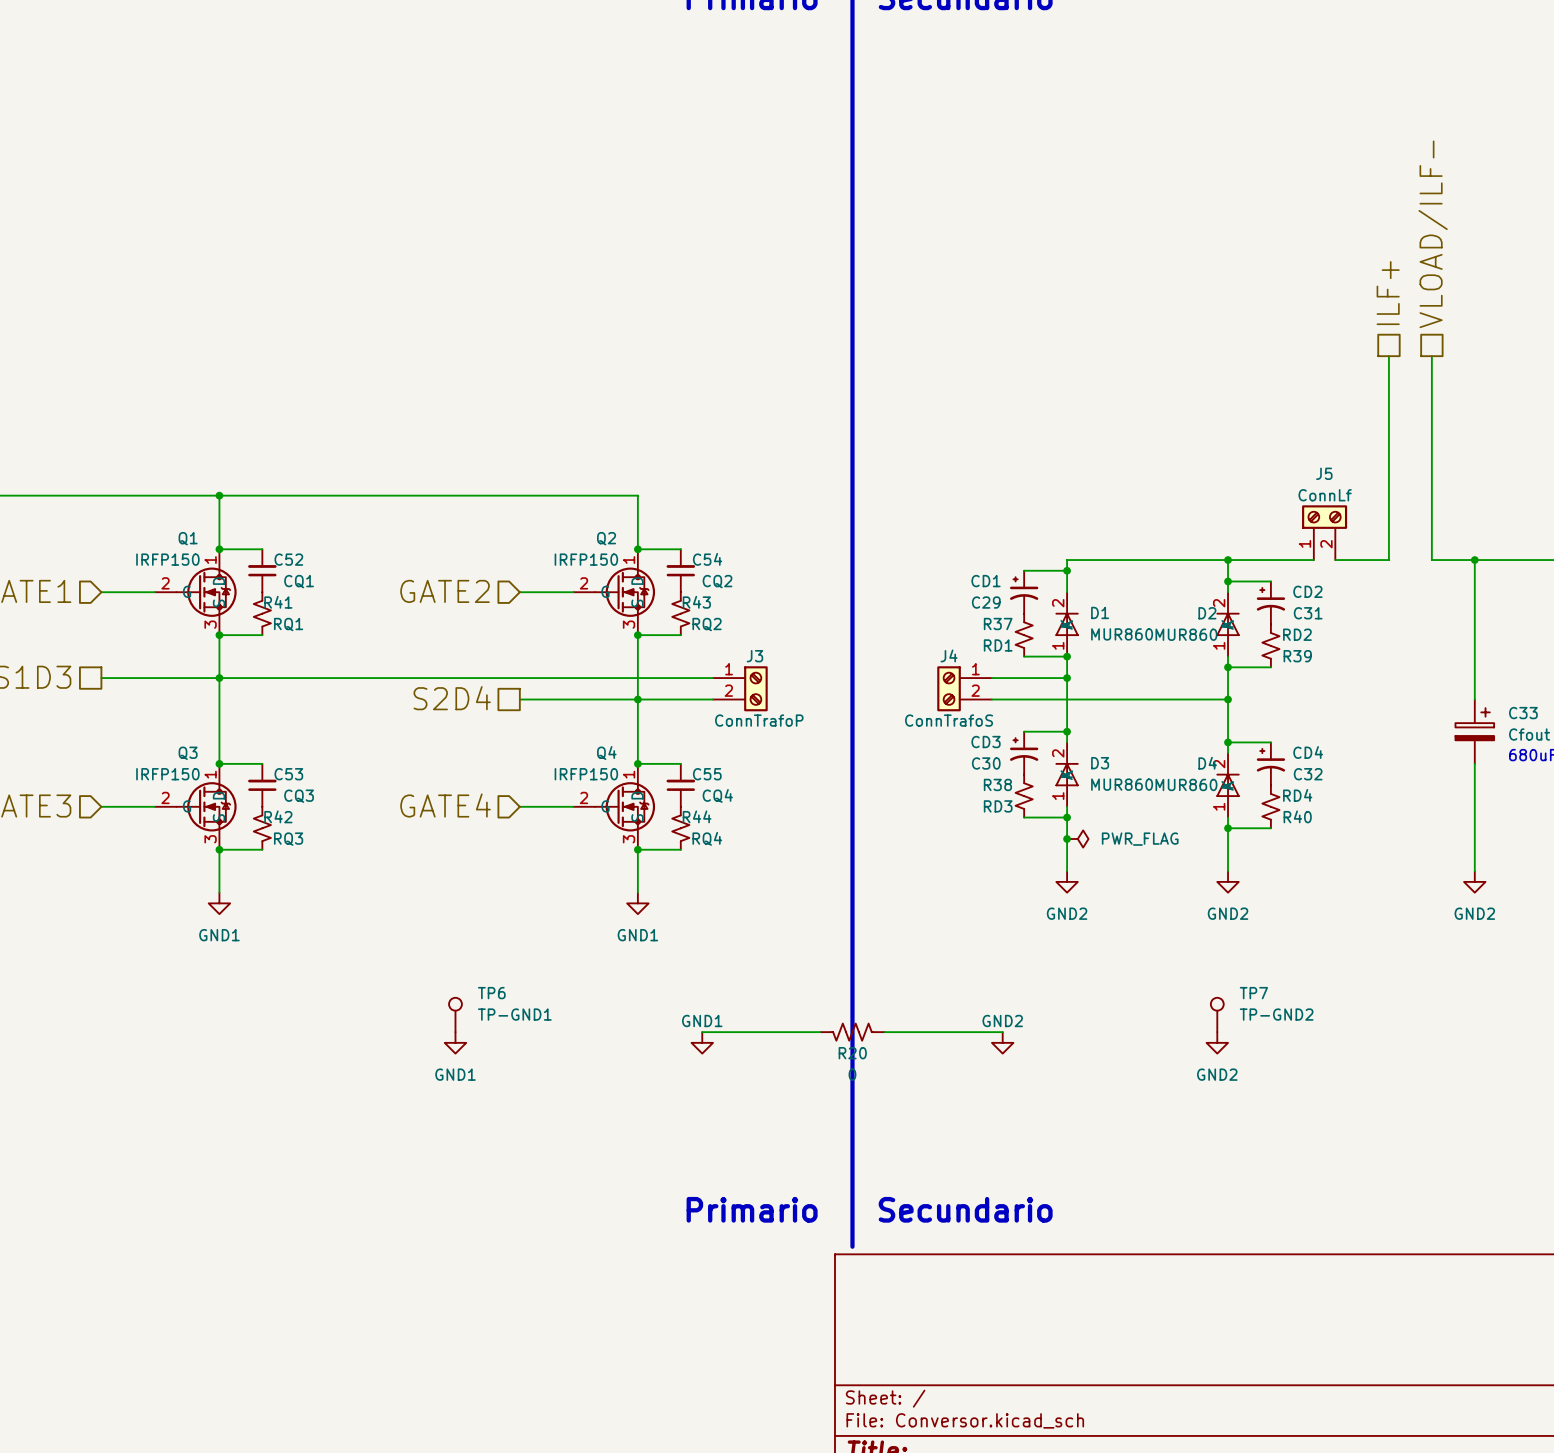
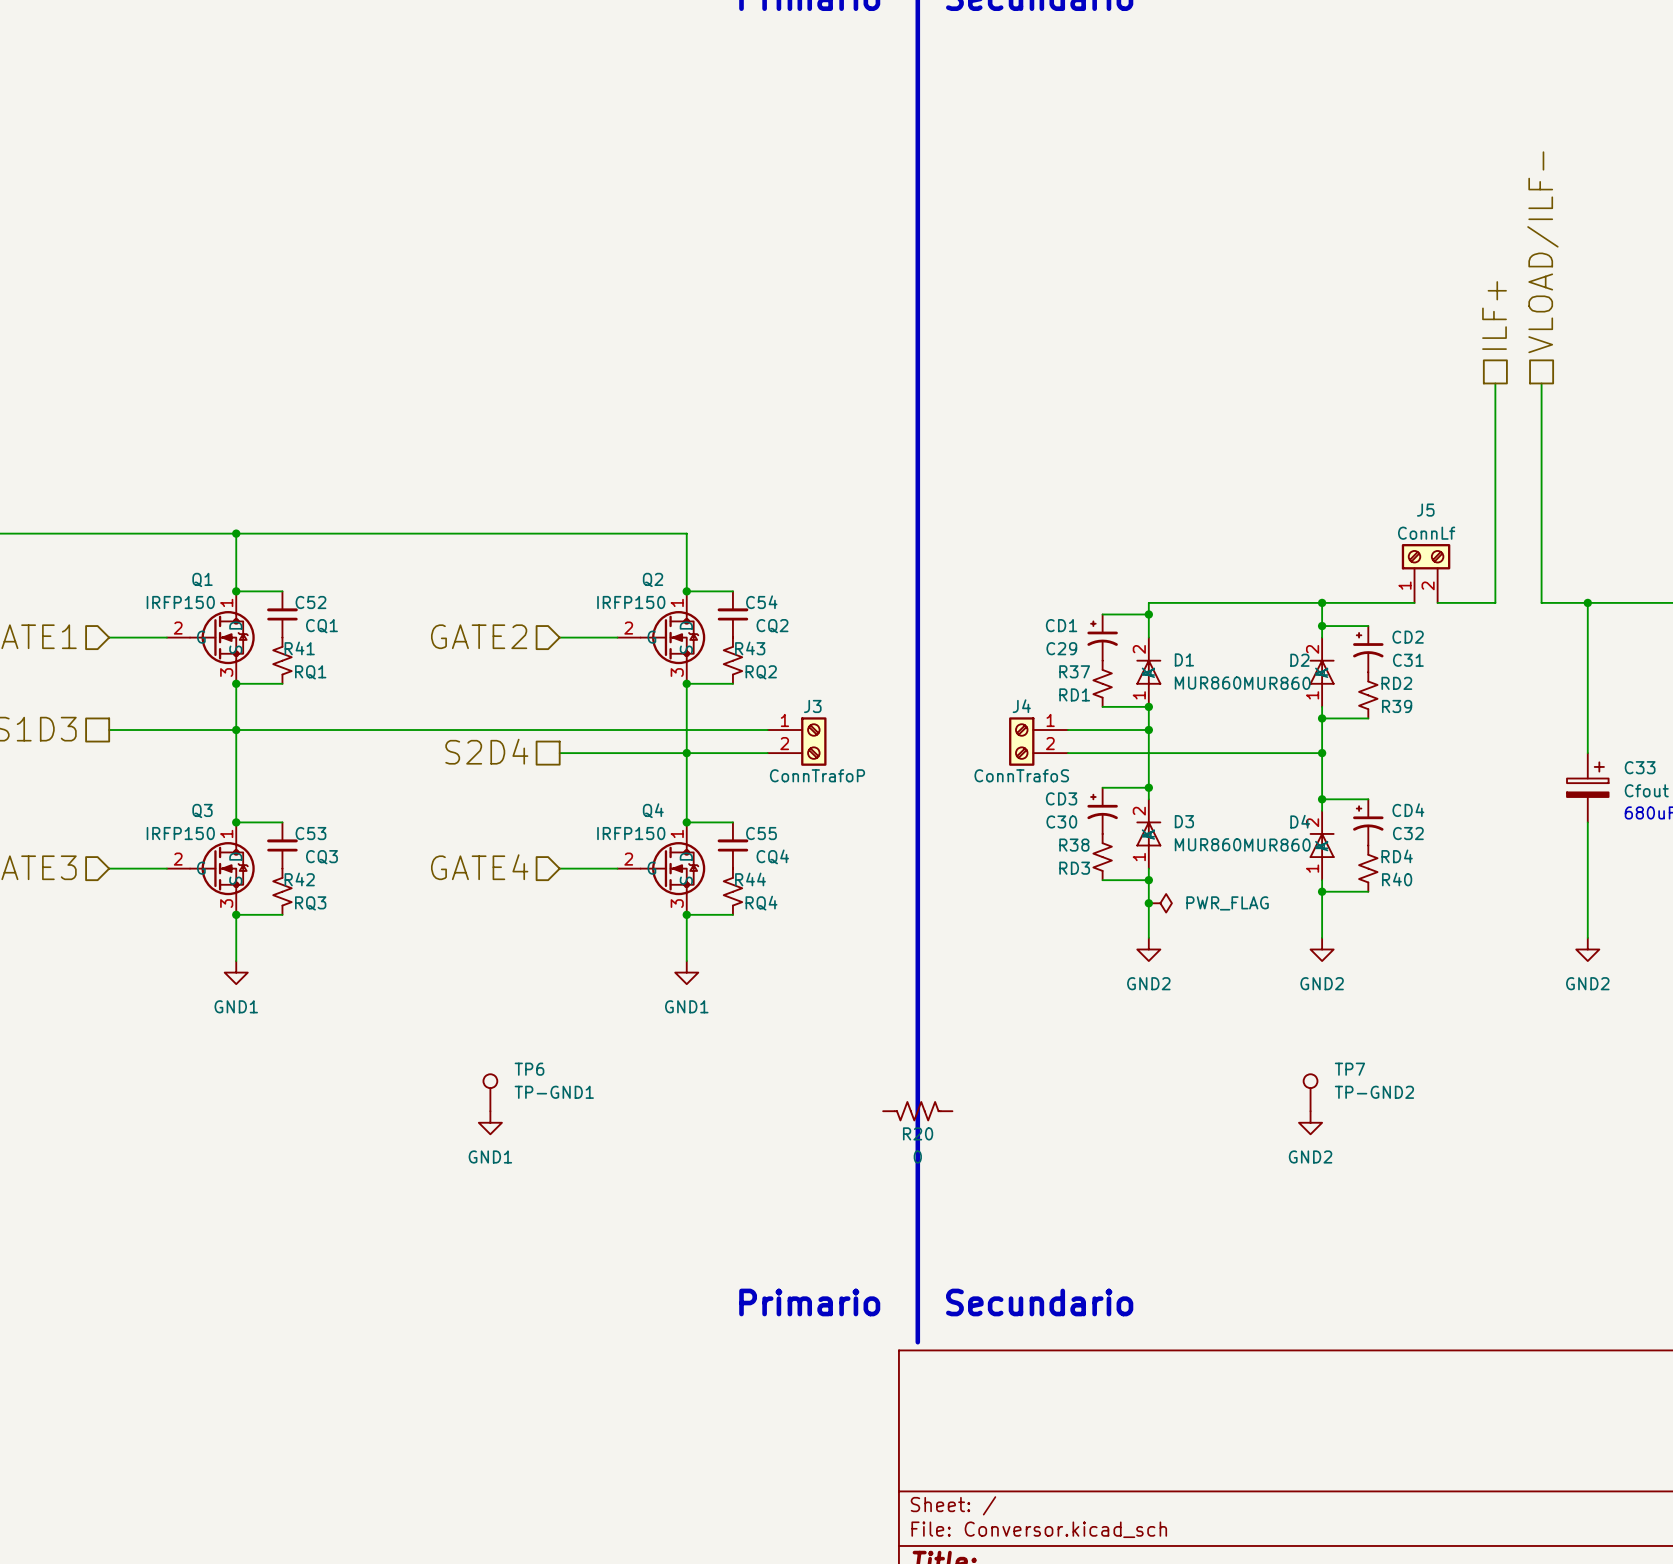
wire: (702, 1032) (820, 1032) -> none
wire: (884, 1032) (1002, 1032) -> none
power symbol: GND1 (702, 1042) -> none
power symbol: GND2 (1002, 1042) -> none

